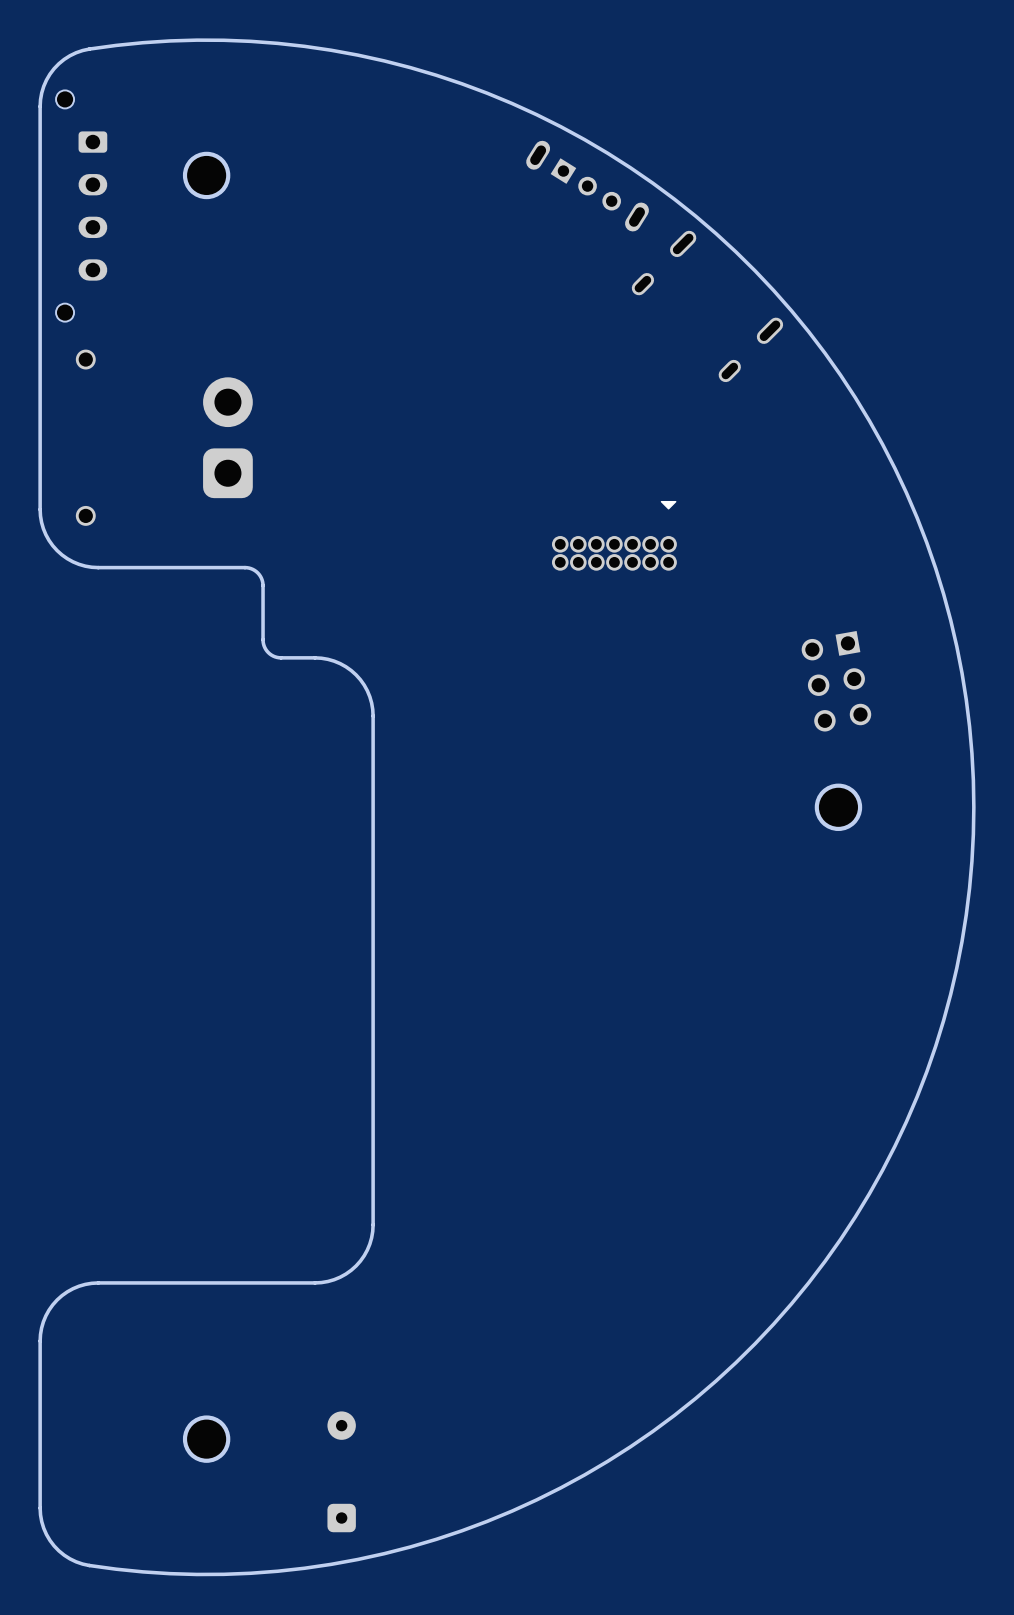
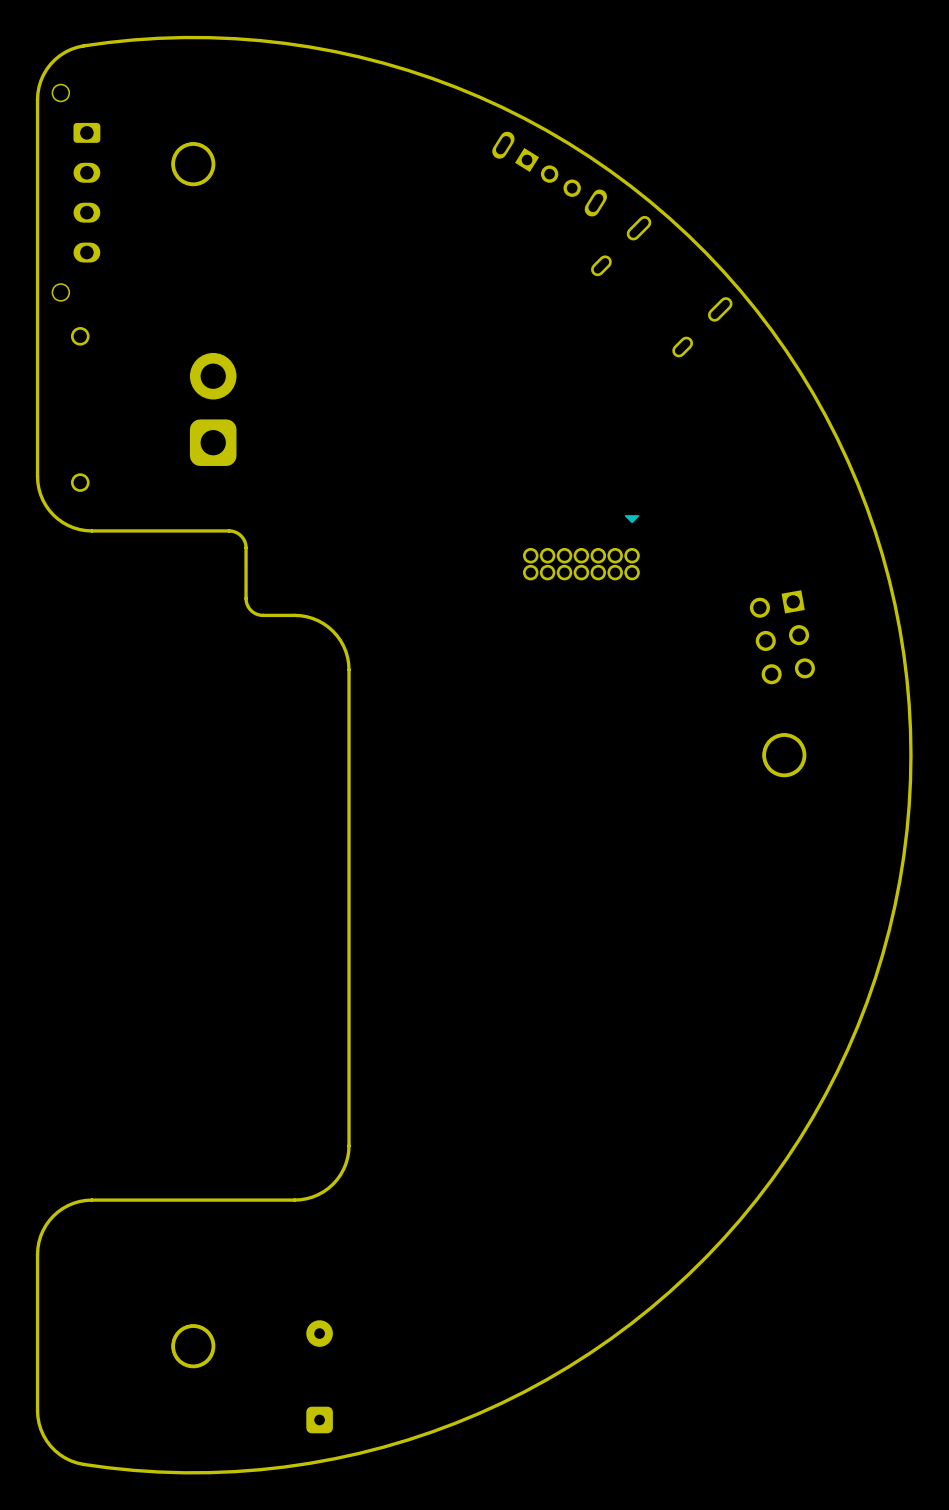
part position: (614, 535) -> (581, 547)

